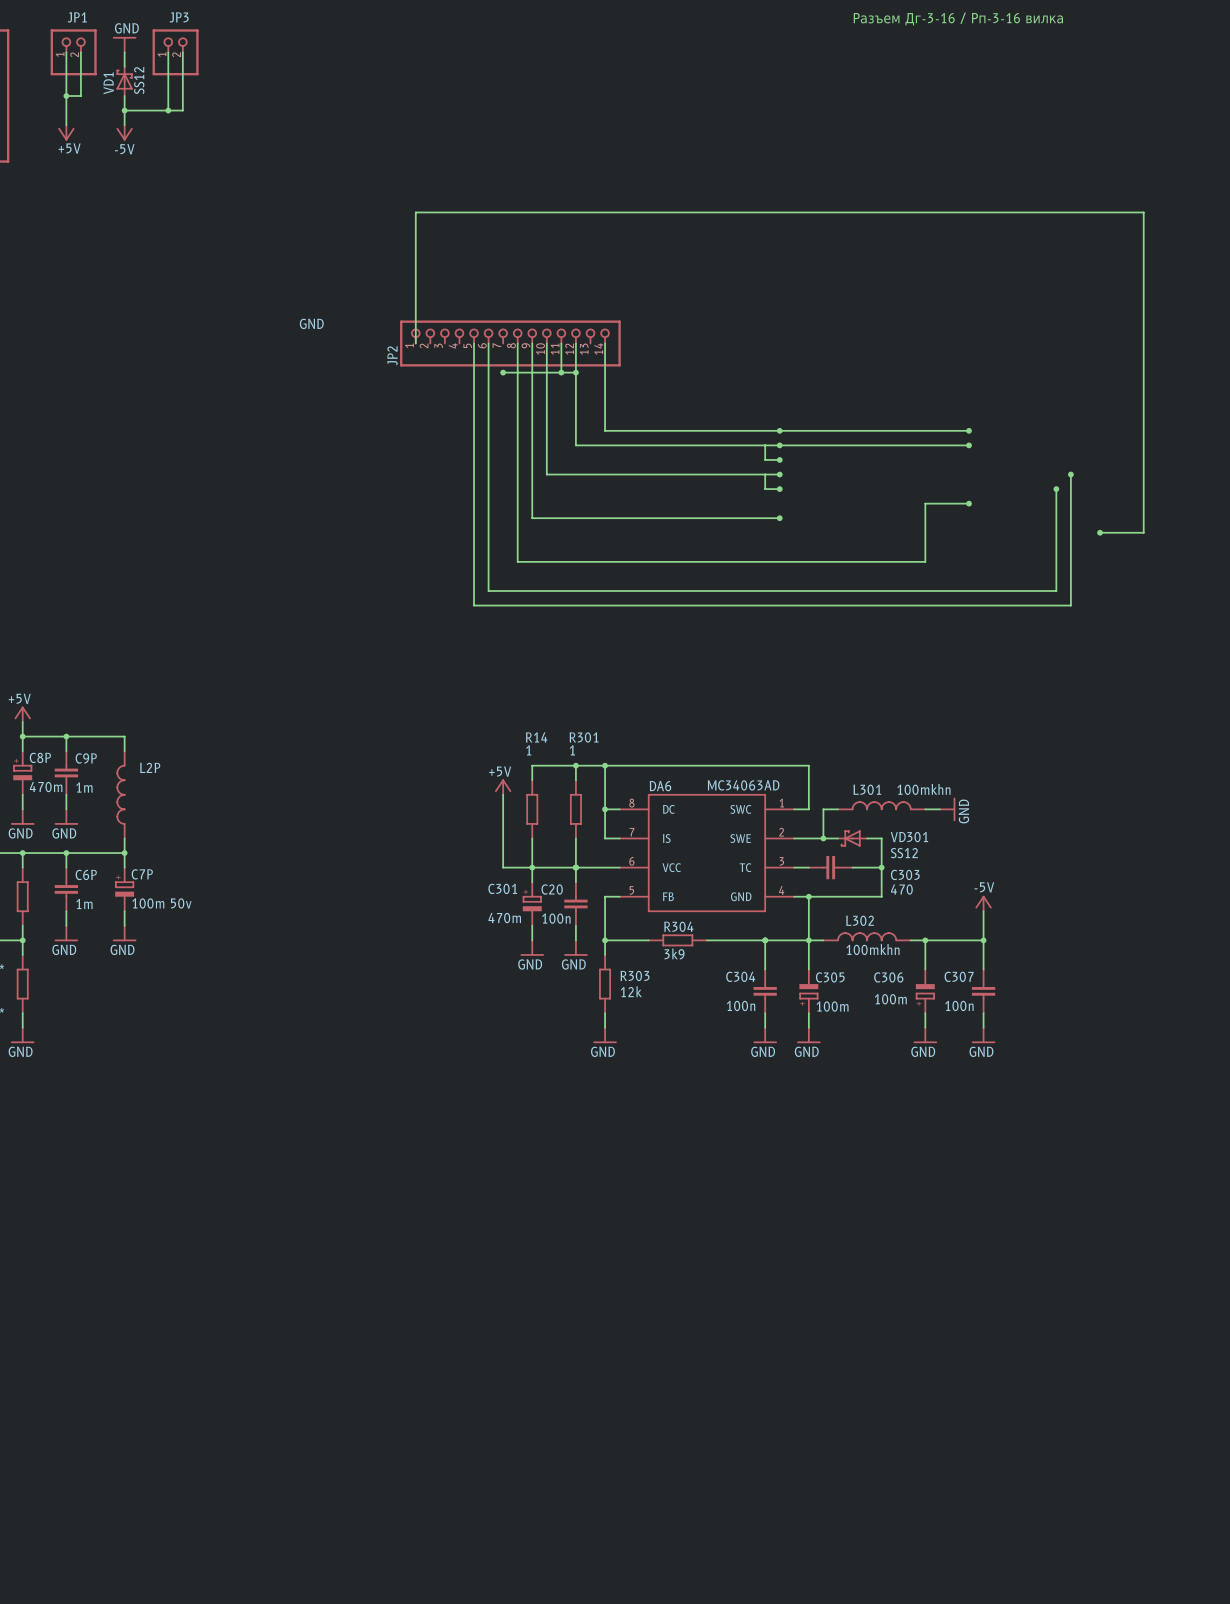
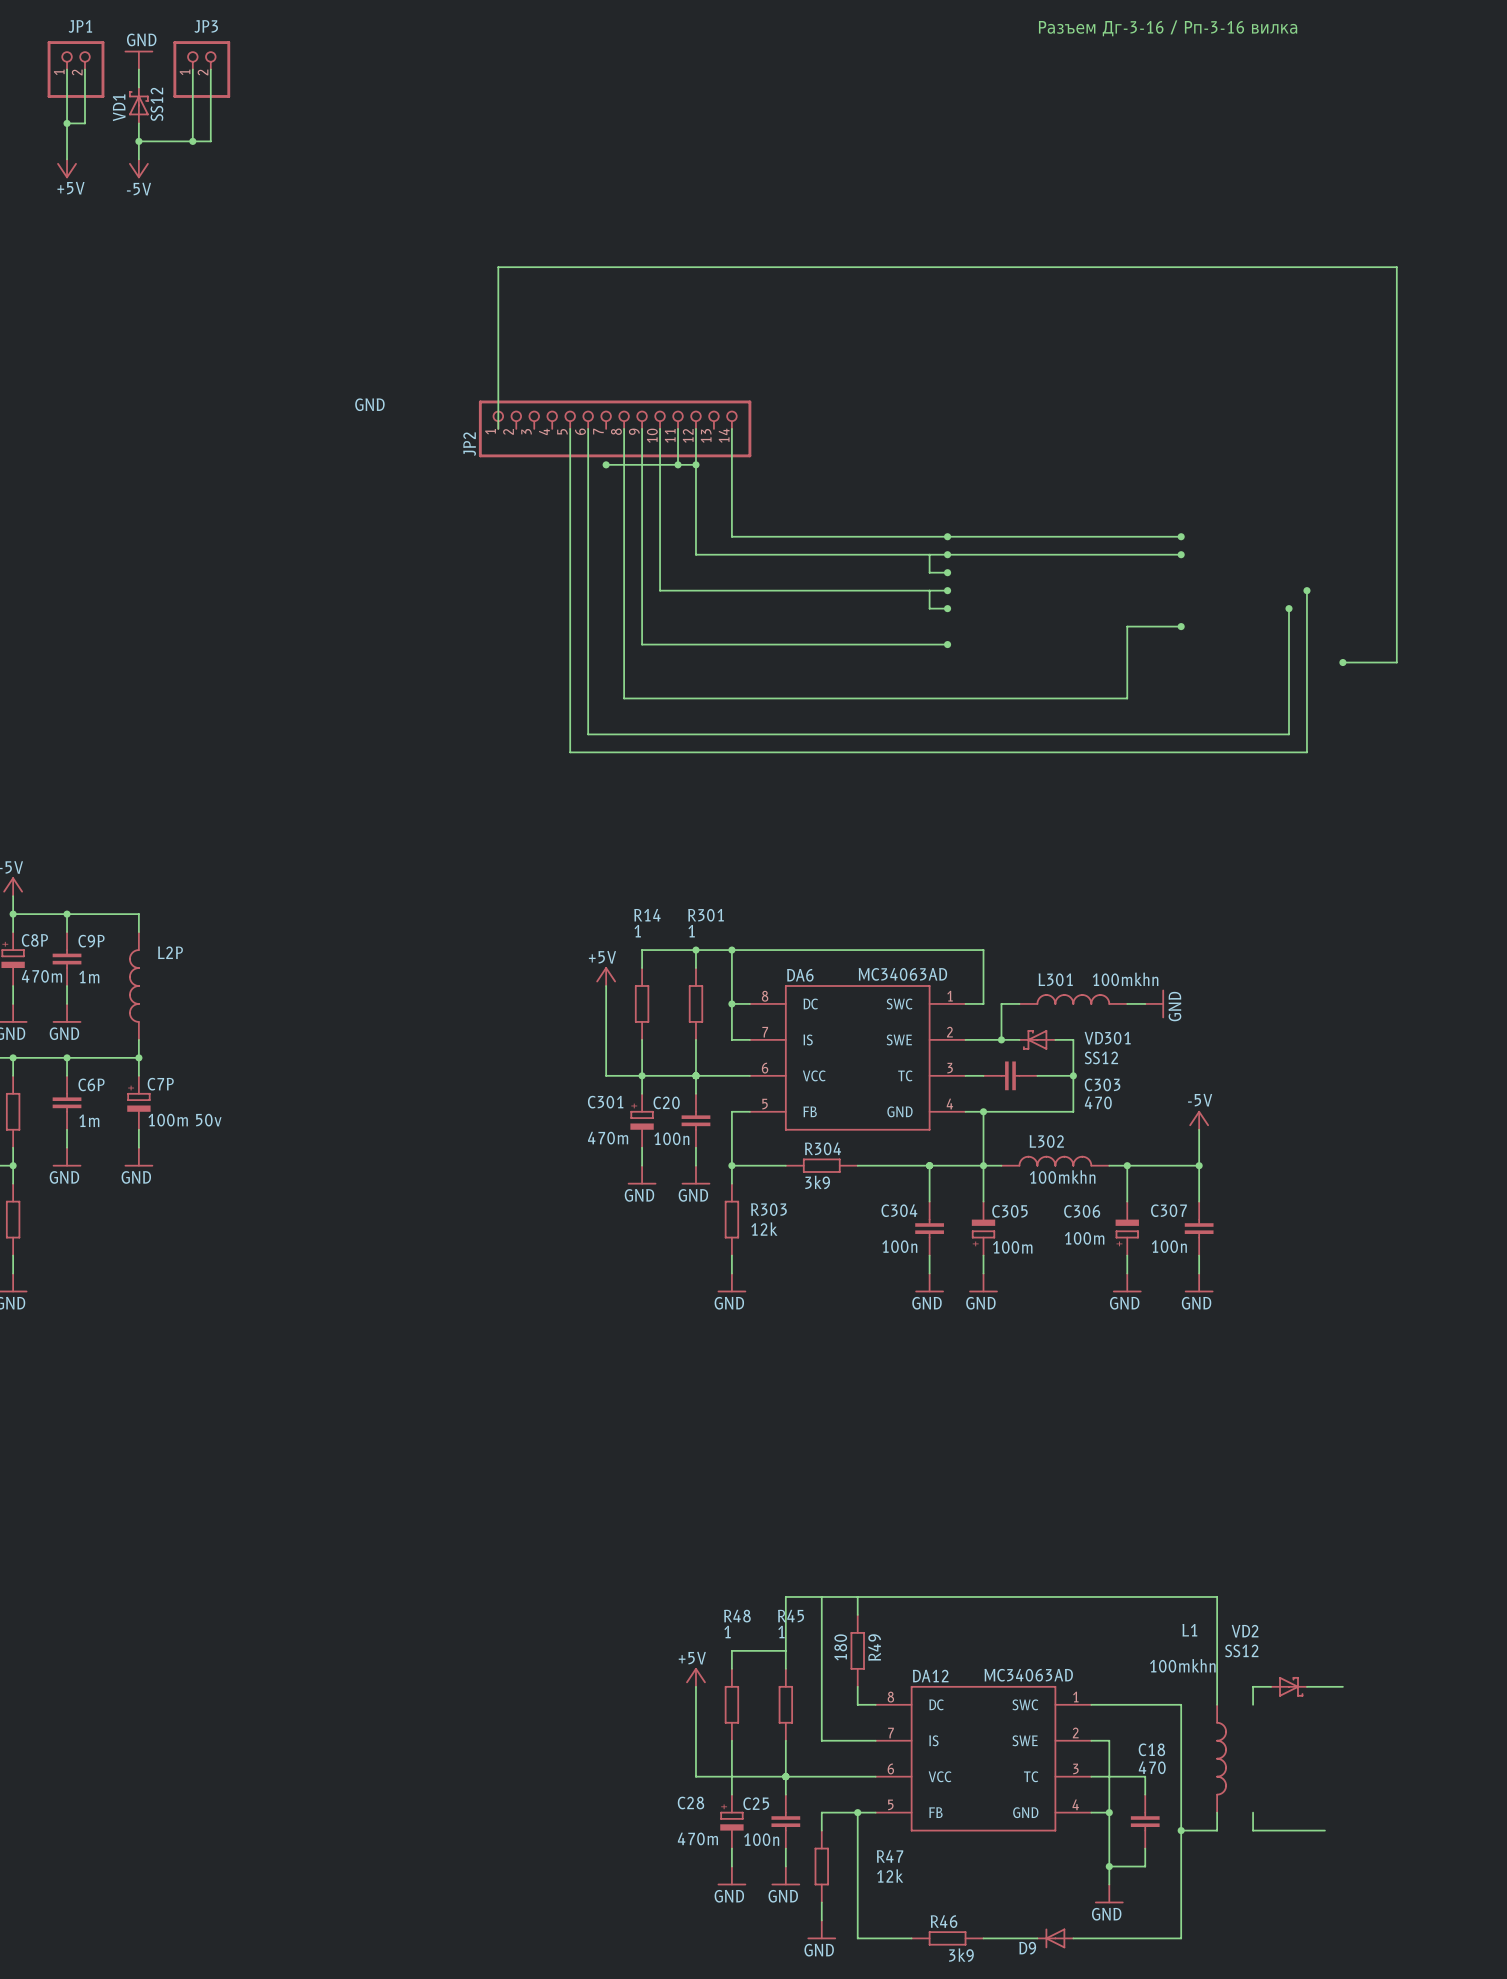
wire: none -> (821, 1596) (821, 1740) (875, 1740)
wire: none -> (857, 1596) (857, 1614)
wire: none -> (785, 1650) (731, 1650) (731, 1668)
R49: none -> 180 (857, 1650)
wire: none -> (785, 1668) (785, 1596) (1217, 1596) (1217, 1704)
power symbol: none -> +5V (695, 1677)
wire: none -> (695, 1686) (695, 1776) (875, 1776)
wire: none -> (857, 1686) (857, 1704) (875, 1704)
wire: none -> (1271, 1686) (1253, 1686) (1253, 1704)
VD2: none -> SS12 (1289, 1686)
wire: none -> (1306, 1686) (1342, 1686)
R48: none -> 1 (731, 1704)
R45: none -> 1 (785, 1704)
wire: none -> (1091, 1704) (1181, 1704) (1181, 1938) (1073, 1938)
wire: none -> (731, 1740) (731, 1794)
wire: none -> (785, 1740) (785, 1794)
wire: none -> (1091, 1740) (1109, 1740) (1109, 1884)
DA12: none -> MC34063AD (983, 1758)
L1: none -> 100mkhn (1221, 1758)
junction: none -> (785, 1776)
wire: none -> (1091, 1776) (1145, 1776) (1145, 1794)
wire: none -> (857, 1812) (857, 1938) (911, 1938)
junction: none -> (857, 1812)
wire: none -> (875, 1812) (821, 1812) (821, 1830)
wire: none -> (1091, 1812) (1109, 1812)
junction: none -> (1109, 1812)
wire: none -> (1217, 1812) (1217, 1830) (1181, 1830)
wire: none -> (1253, 1812) (1253, 1830) (1324, 1830)
C28: none -> 470m (731, 1821)
C25: none -> 100n (785, 1821)
C18: none -> 470 (1145, 1821)
junction: none -> (1181, 1830)
wire: none -> (731, 1848) (731, 1866)
wire: none -> (785, 1848) (785, 1866)
wire: none -> (1145, 1848) (1145, 1866) (1109, 1866)
R47: none -> 12k (821, 1866)
junction: none -> (1109, 1866)
power symbol: none -> GND (731, 1875)
power symbol: none -> GND (785, 1875)
power symbol: none -> GND (1109, 1893)
wire: none -> (821, 1902) (821, 1920)
power symbol: none -> GND (821, 1929)
R46: none -> 3k9 (947, 1938)
wire: none -> (983, 1938) (1037, 1938)
D9: none -> (1055, 1938)

